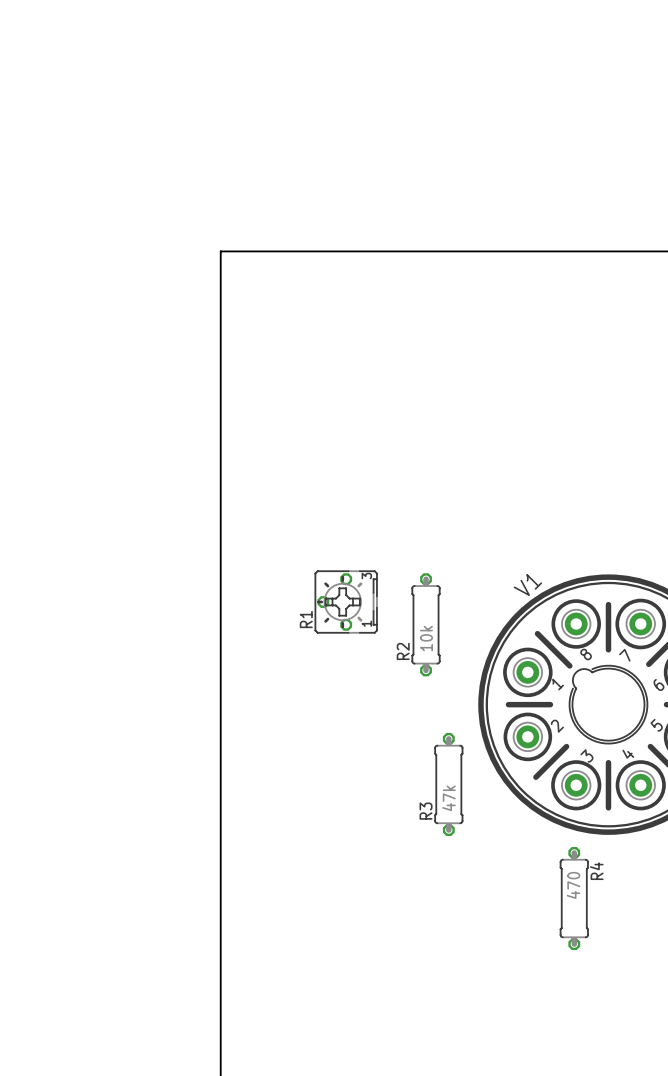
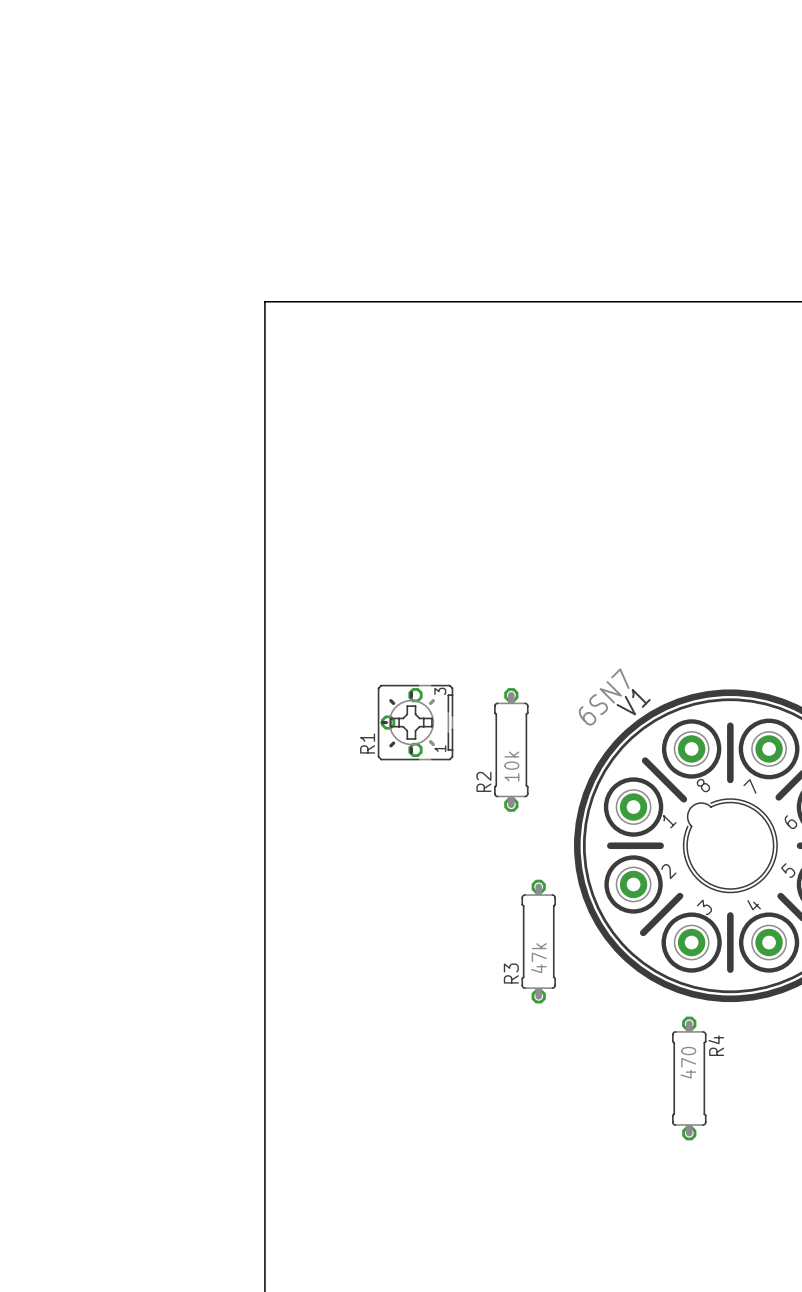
V1 value: none -> 6SN7 (604, 696)

